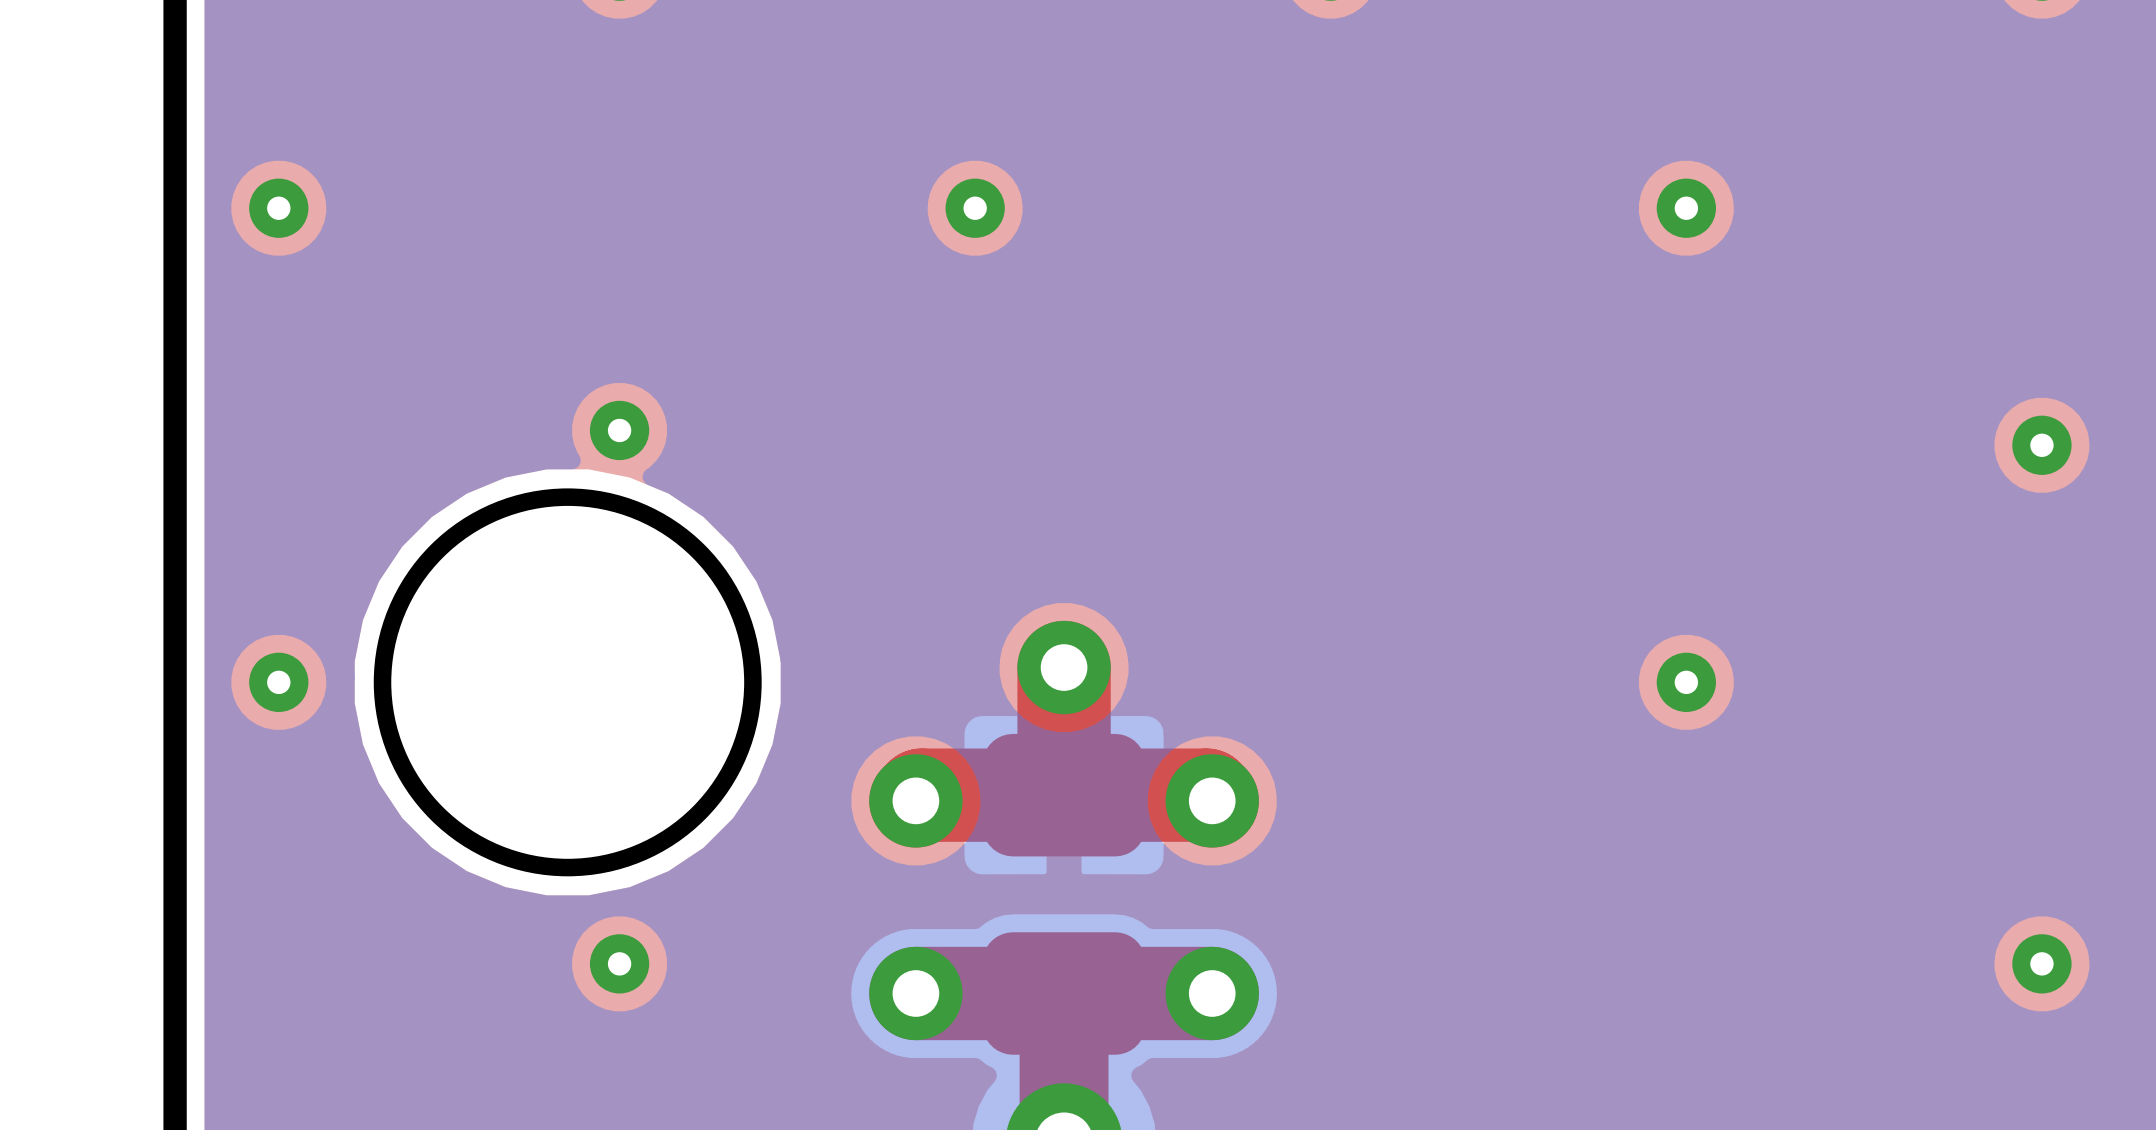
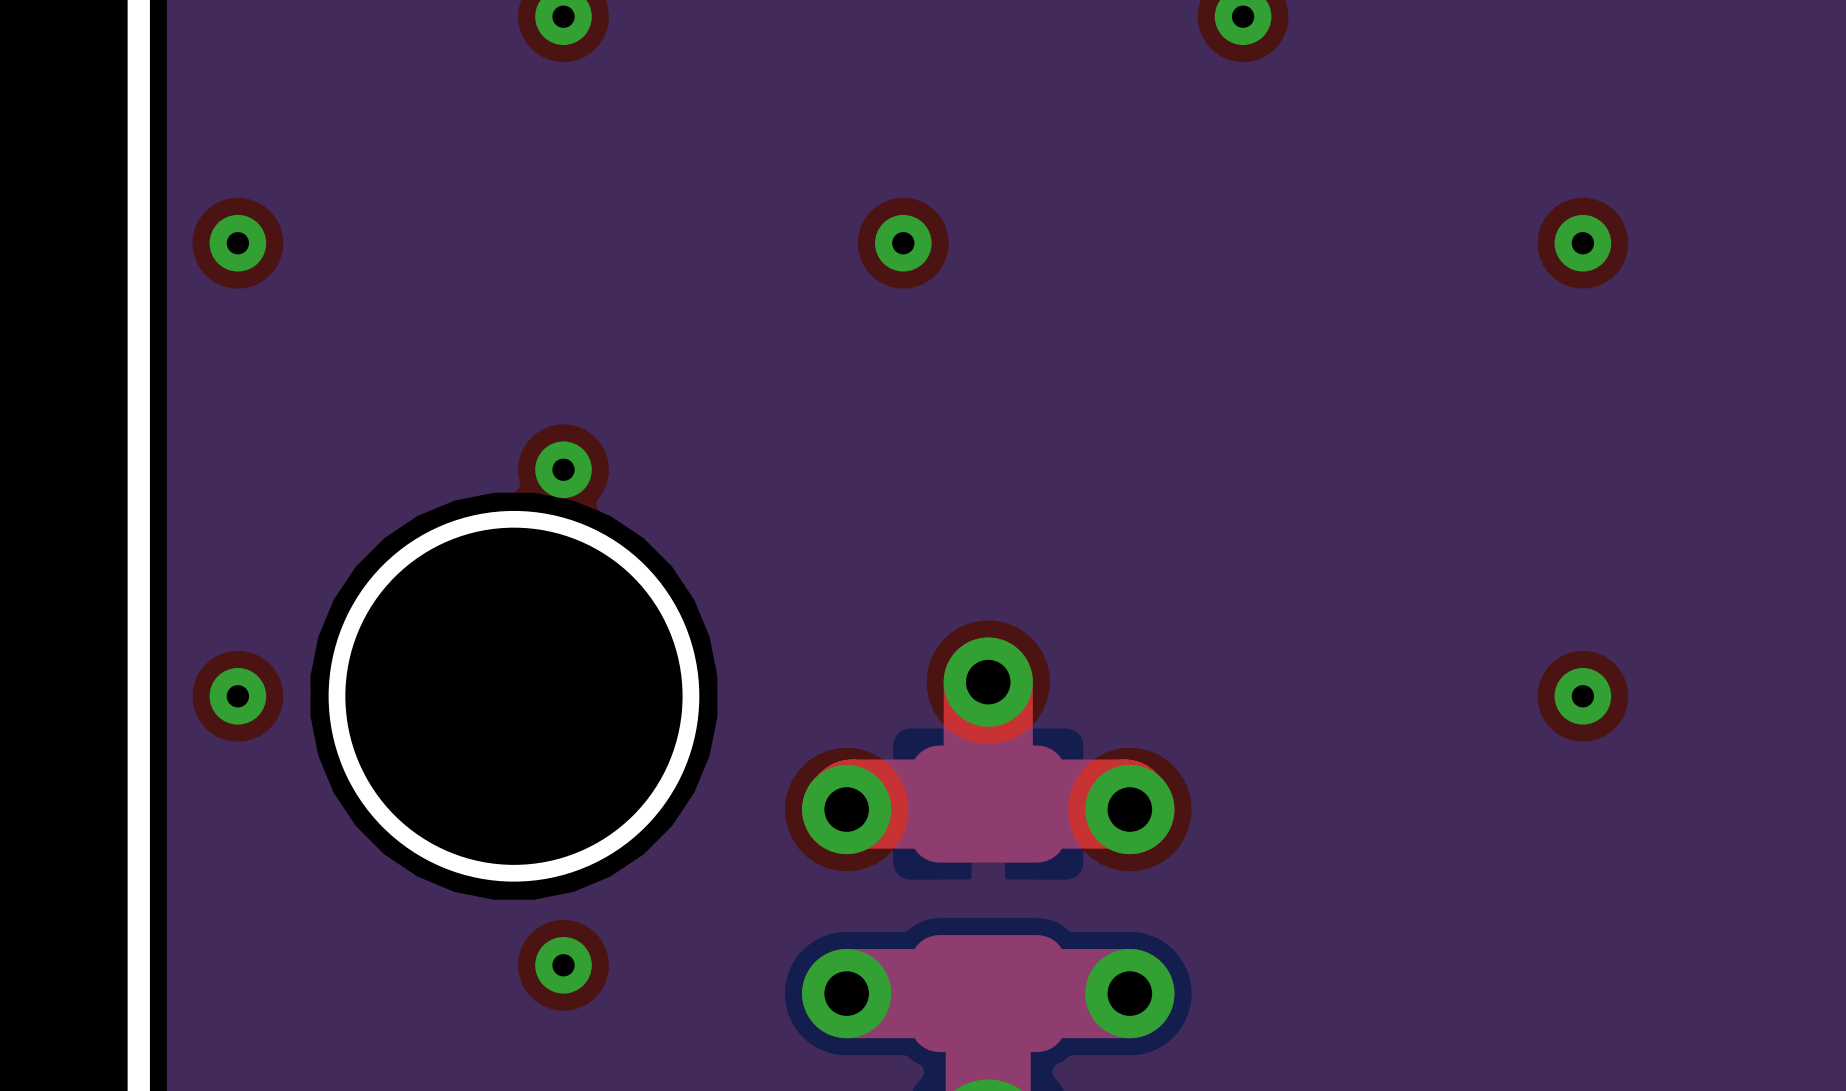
via position: (619, 430) -> (563, 469)

